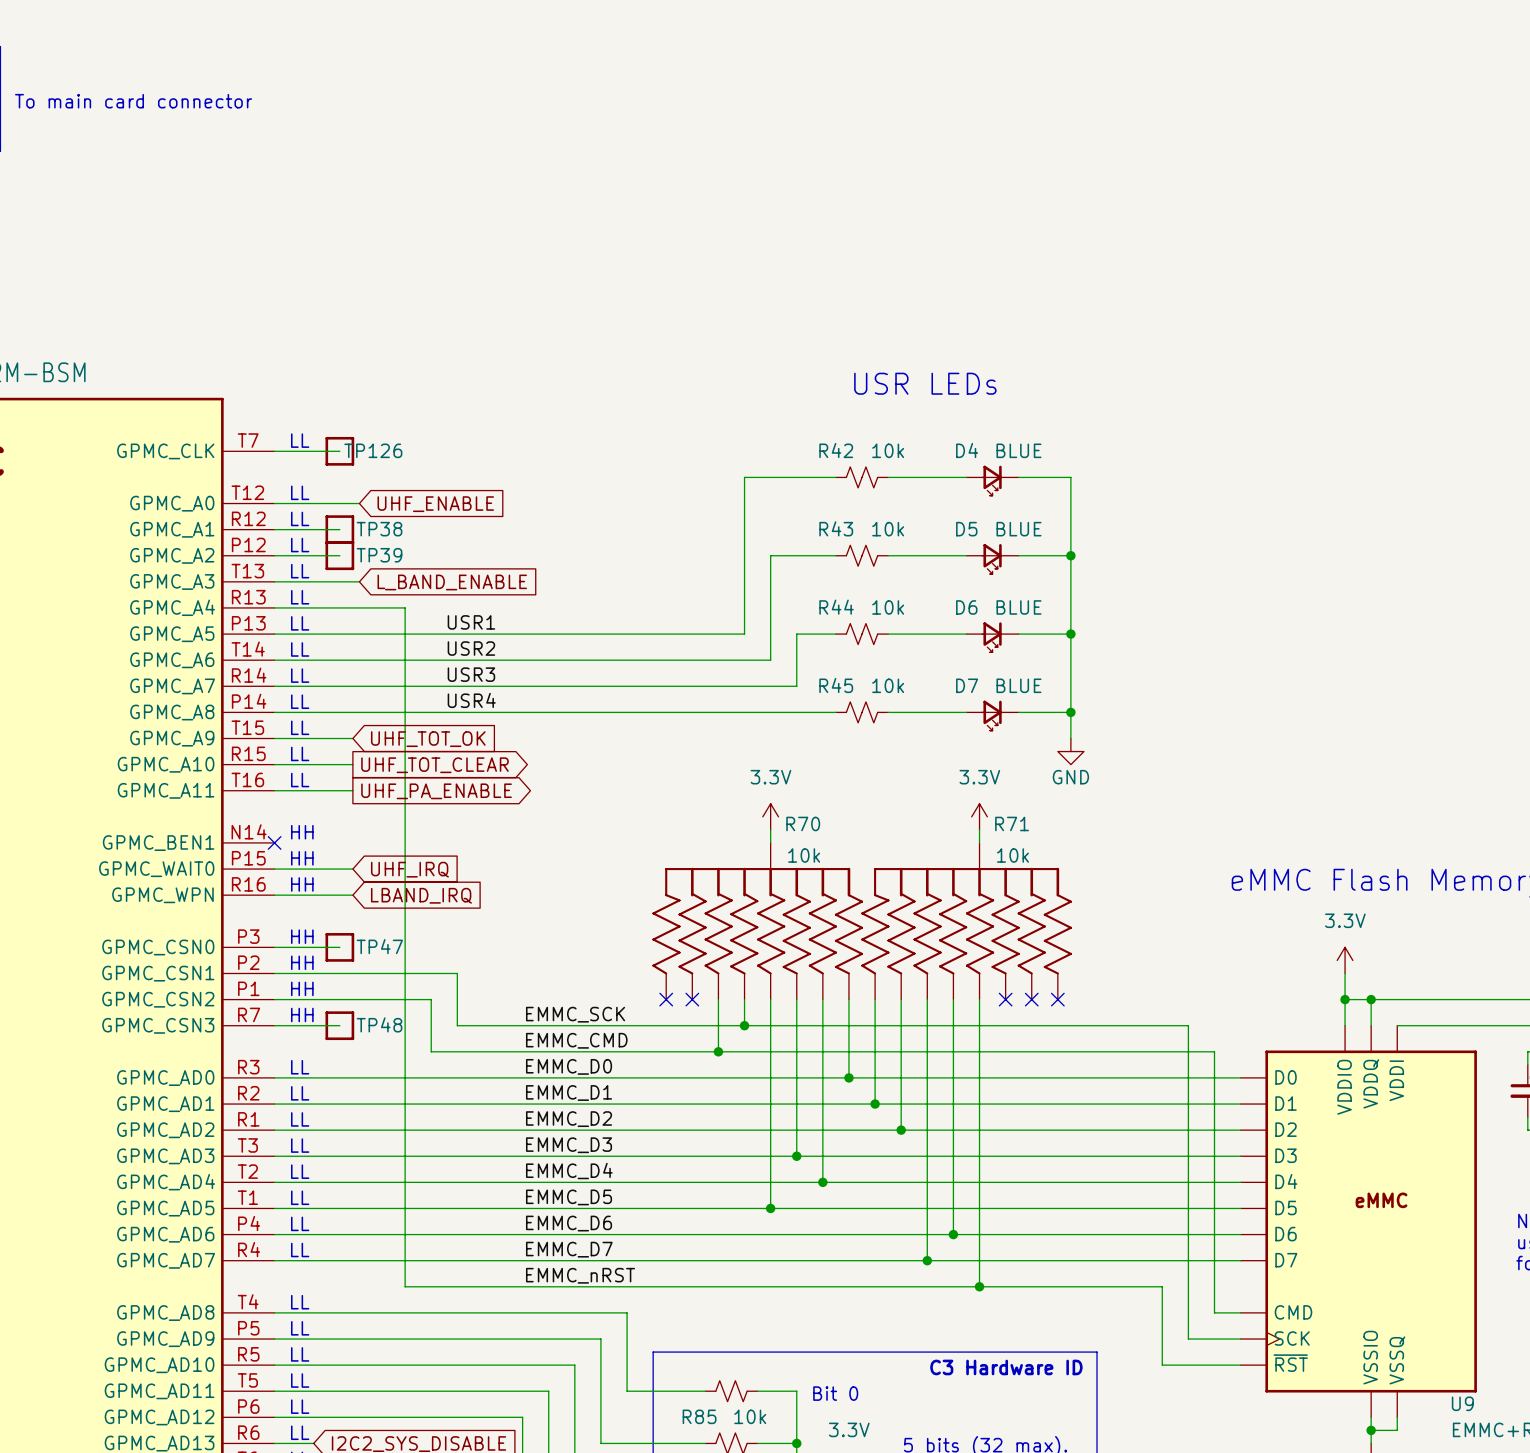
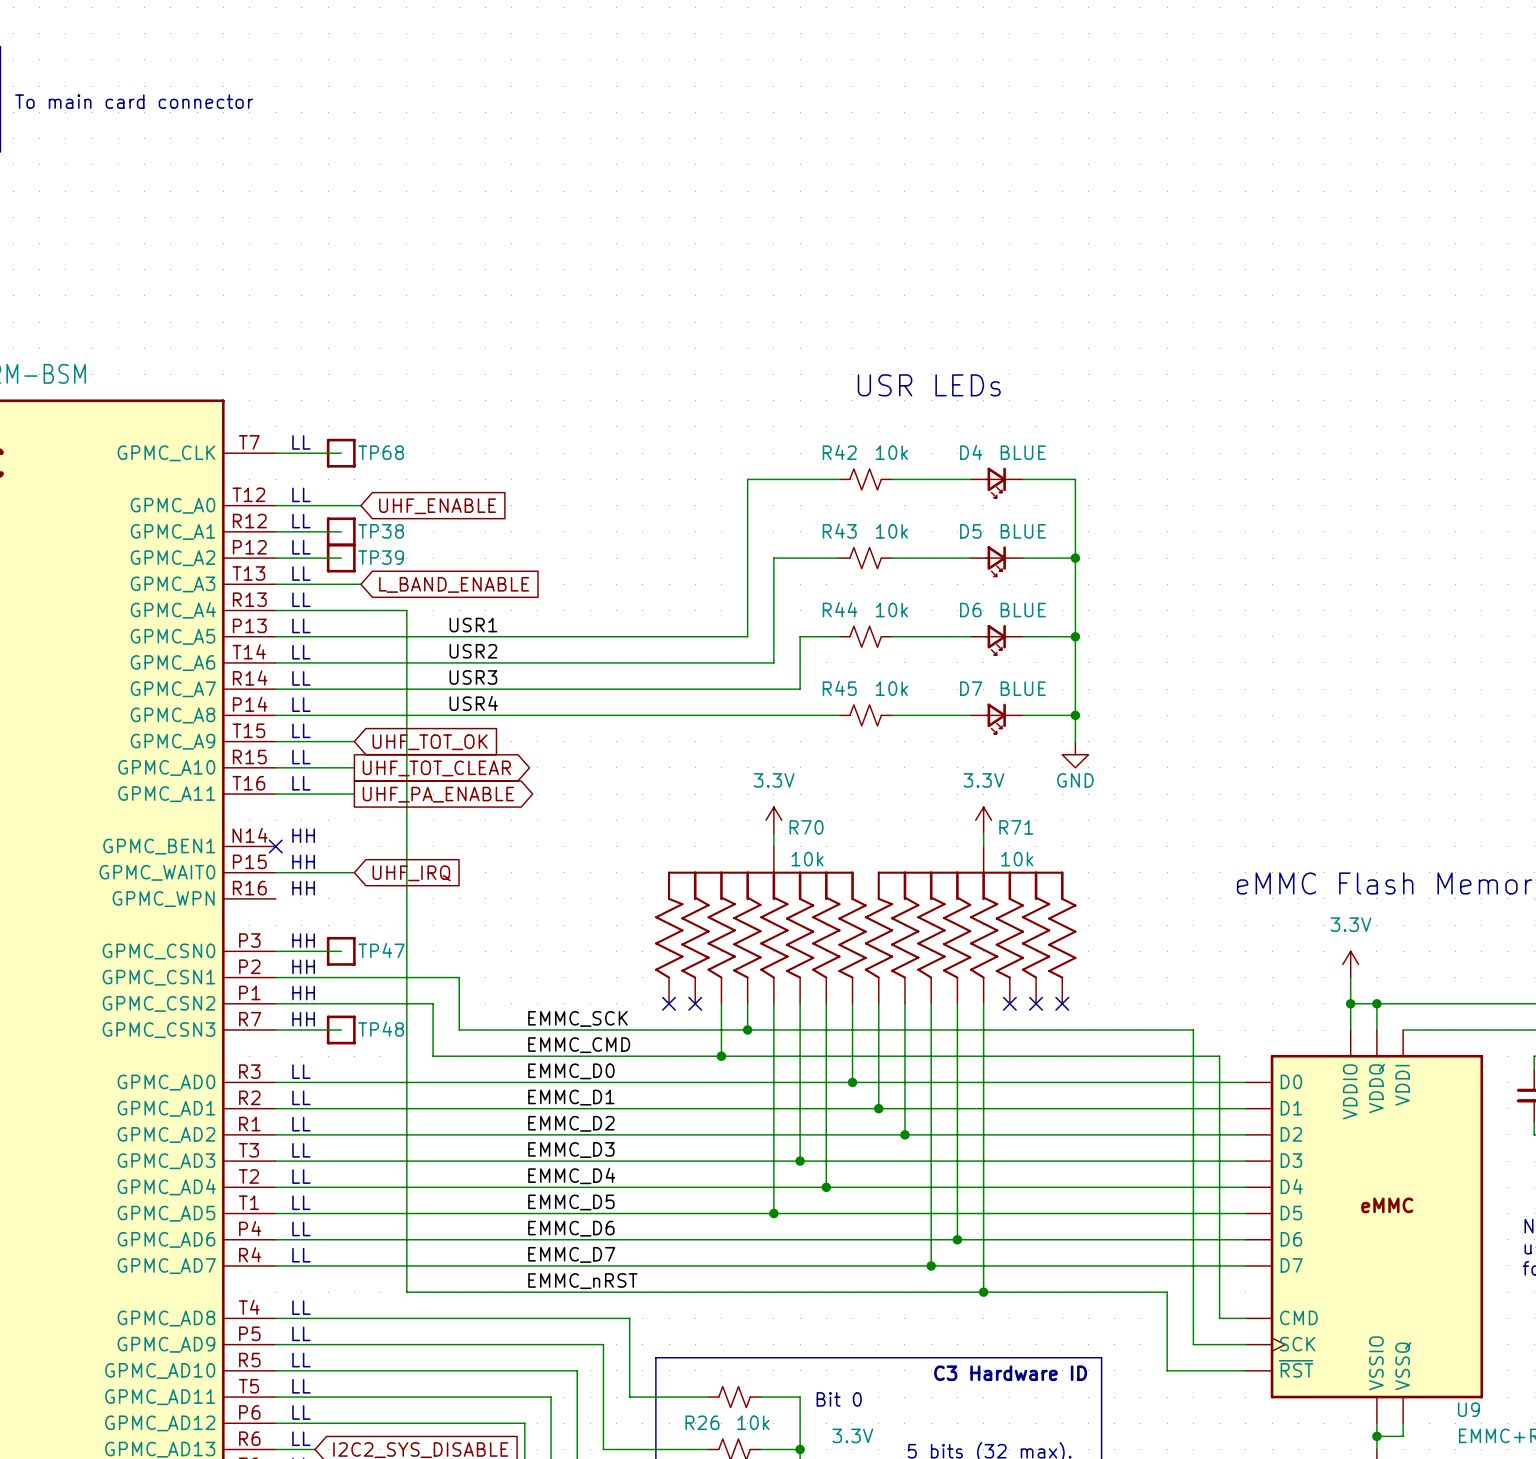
TP126 name: TP126 (373, 450) -> TP68 (381, 452)
wire: (274, 895) (352, 895) -> none
global label: LBAND_IRQ (421, 895) -> none
R85 name: R85 (699, 1416) -> R26 (702, 1422)

